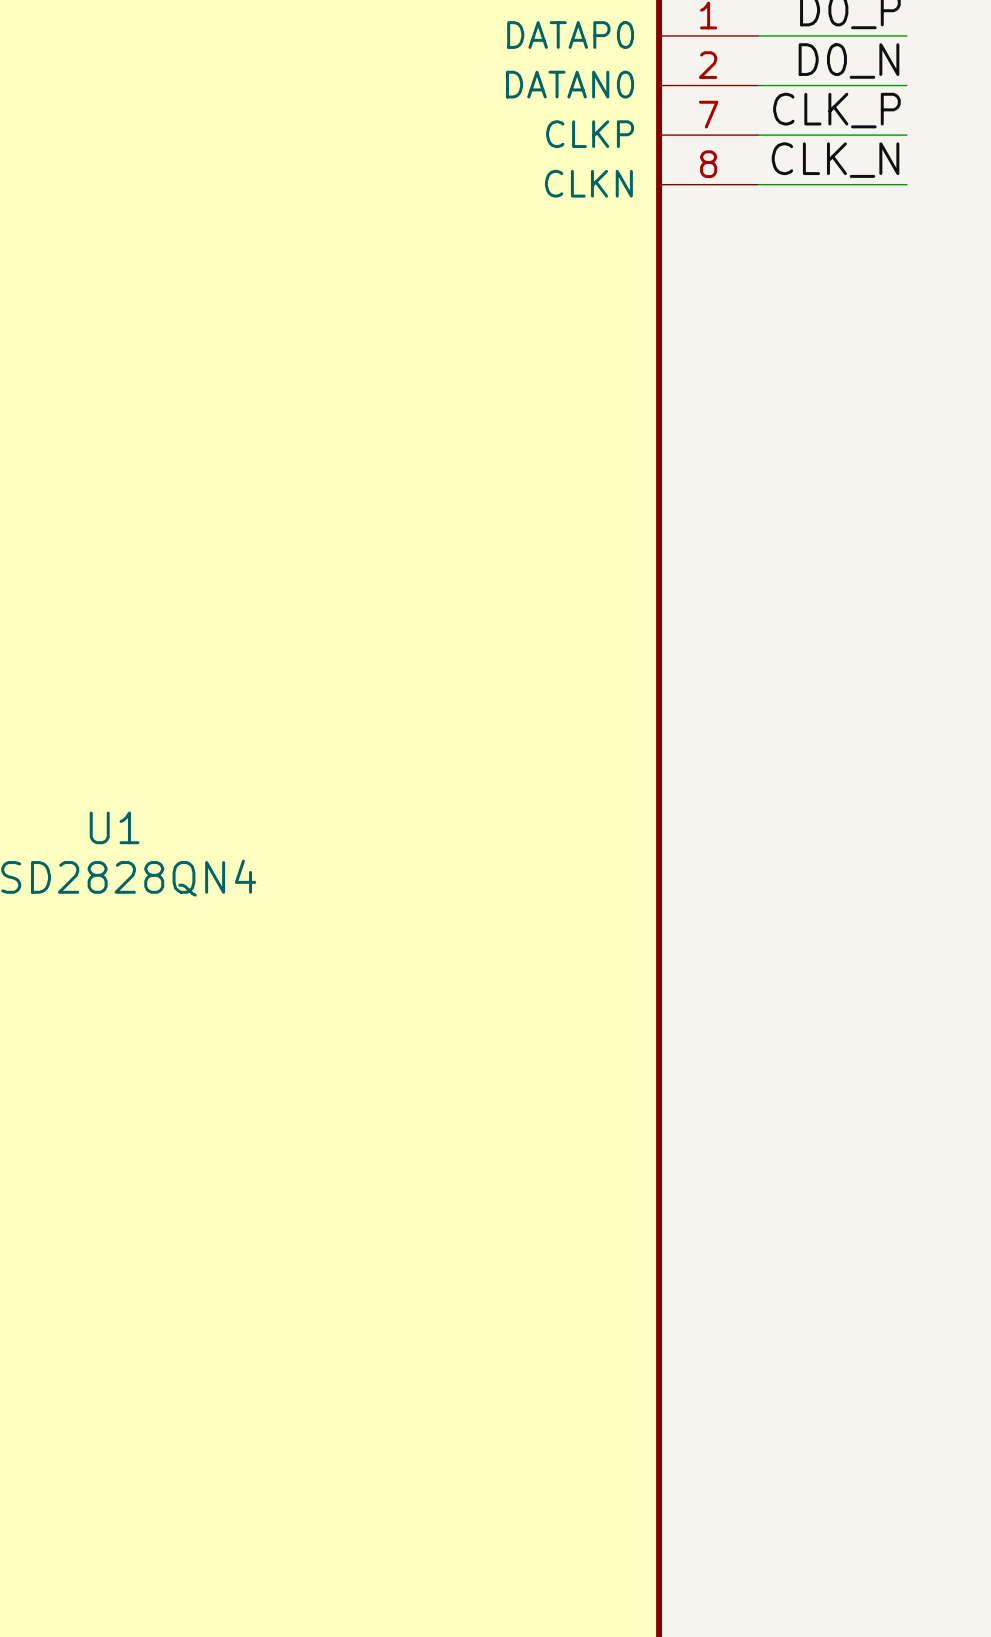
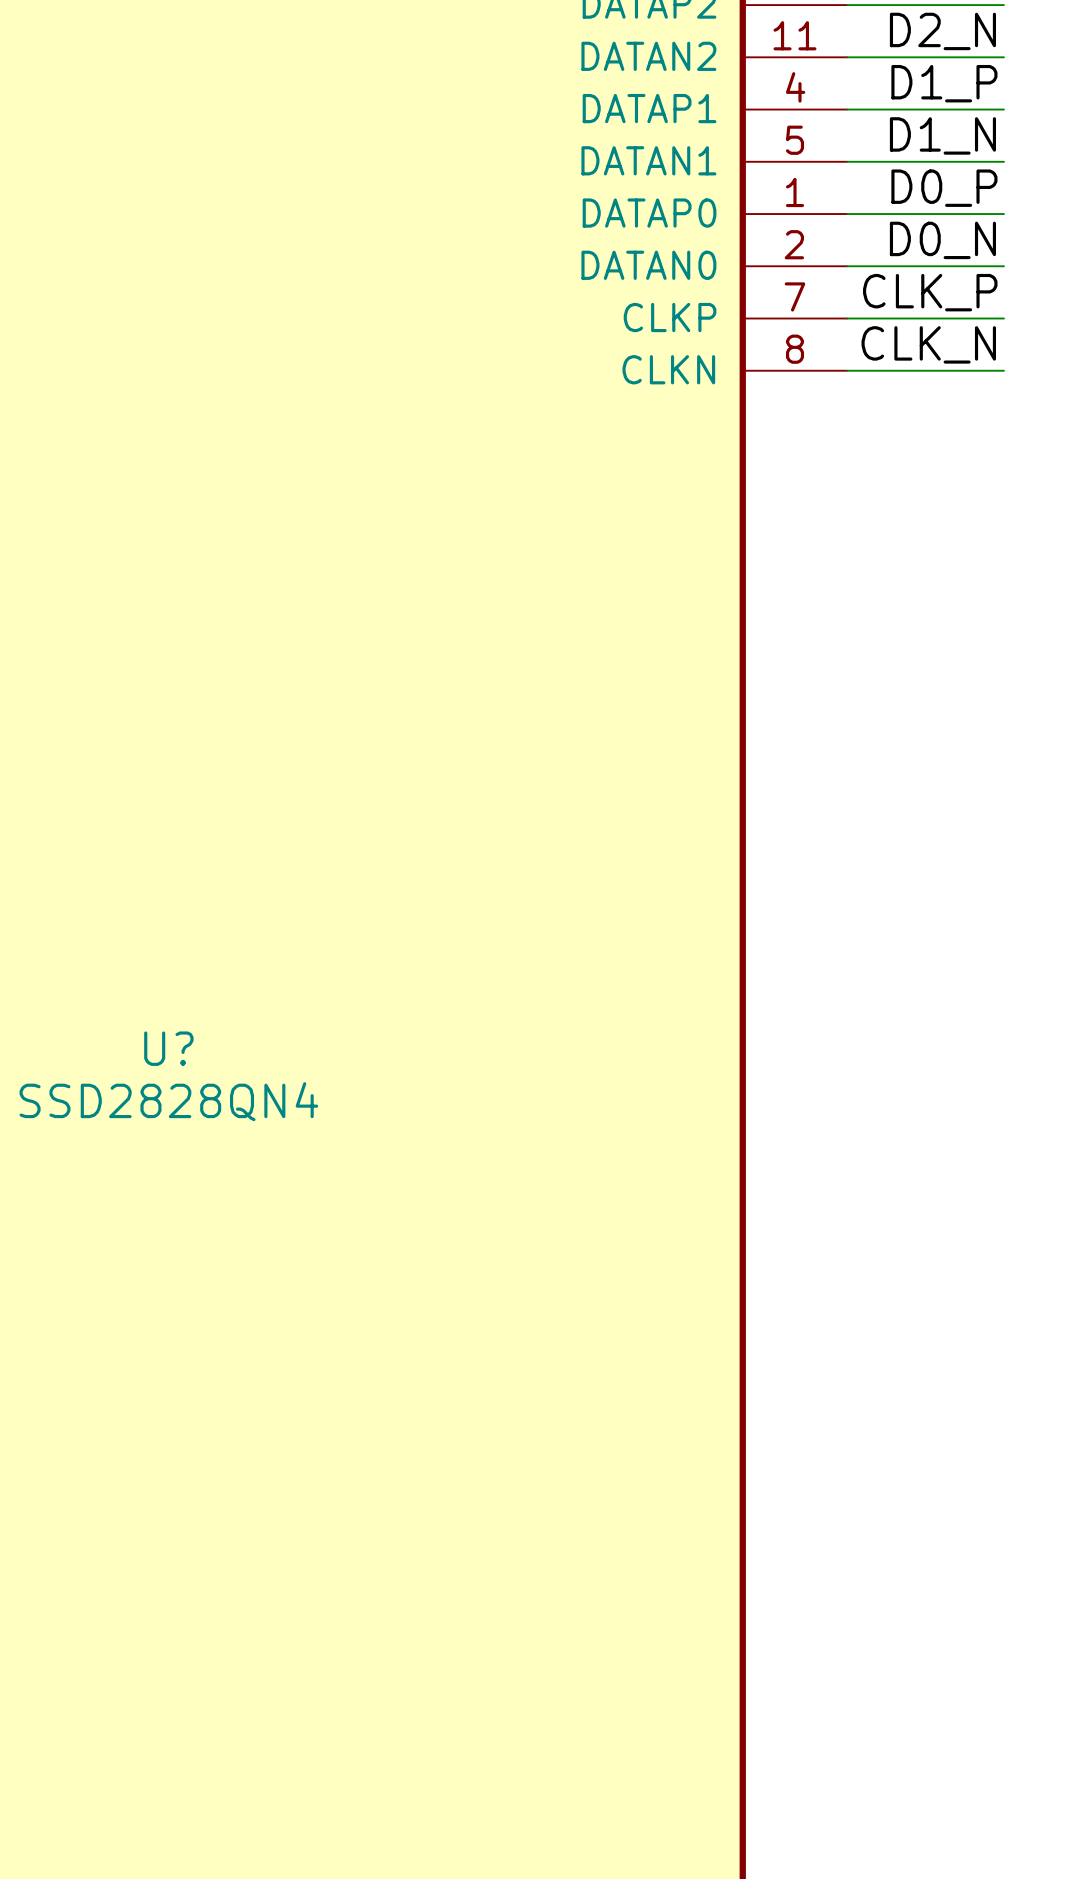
U1 name: U1 (114, 827) -> U? (168, 1048)

